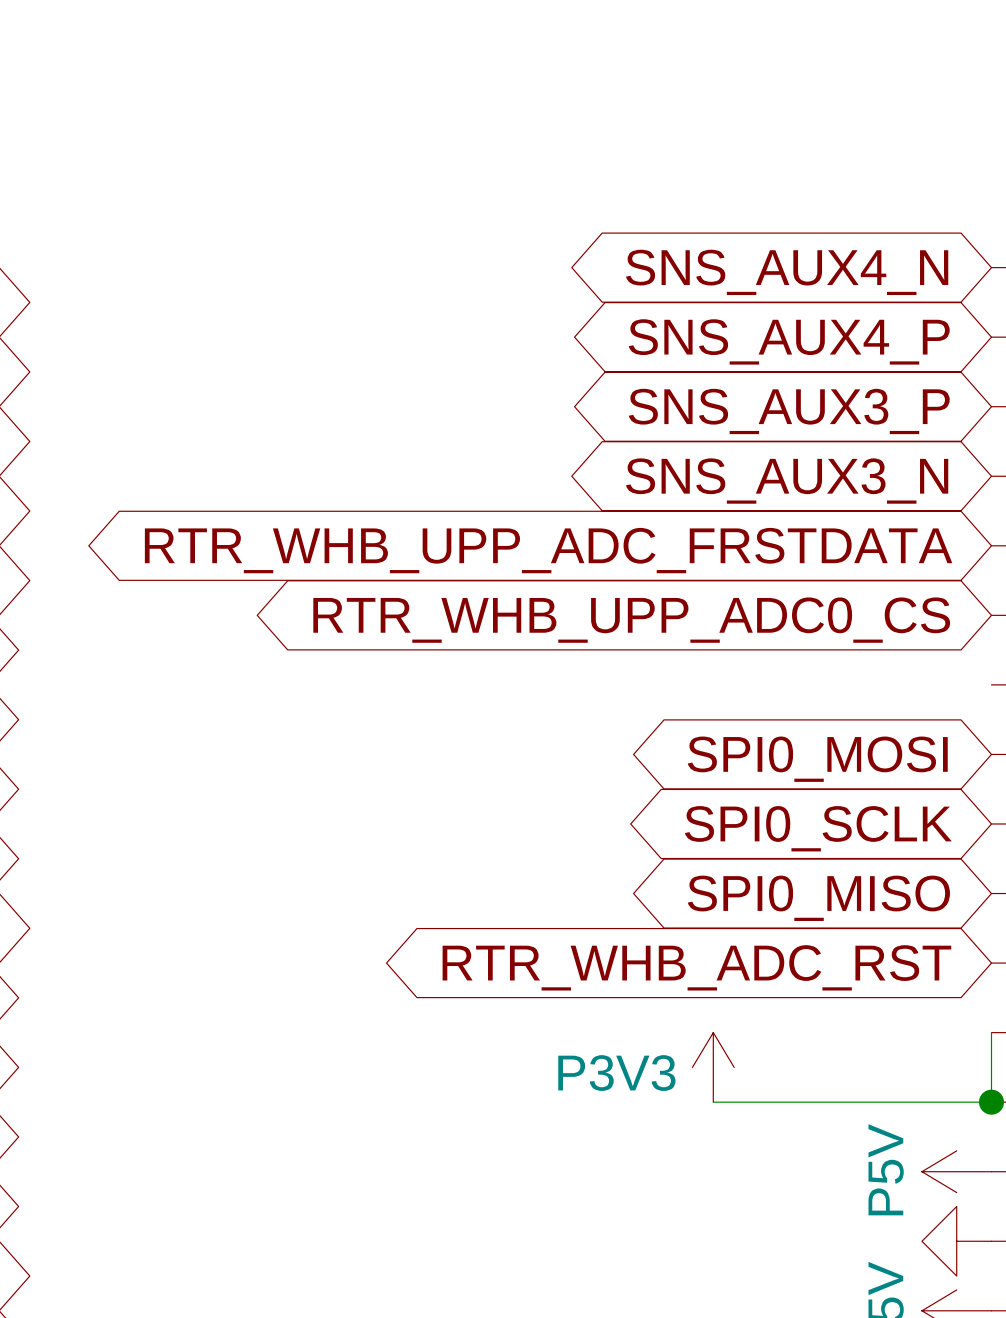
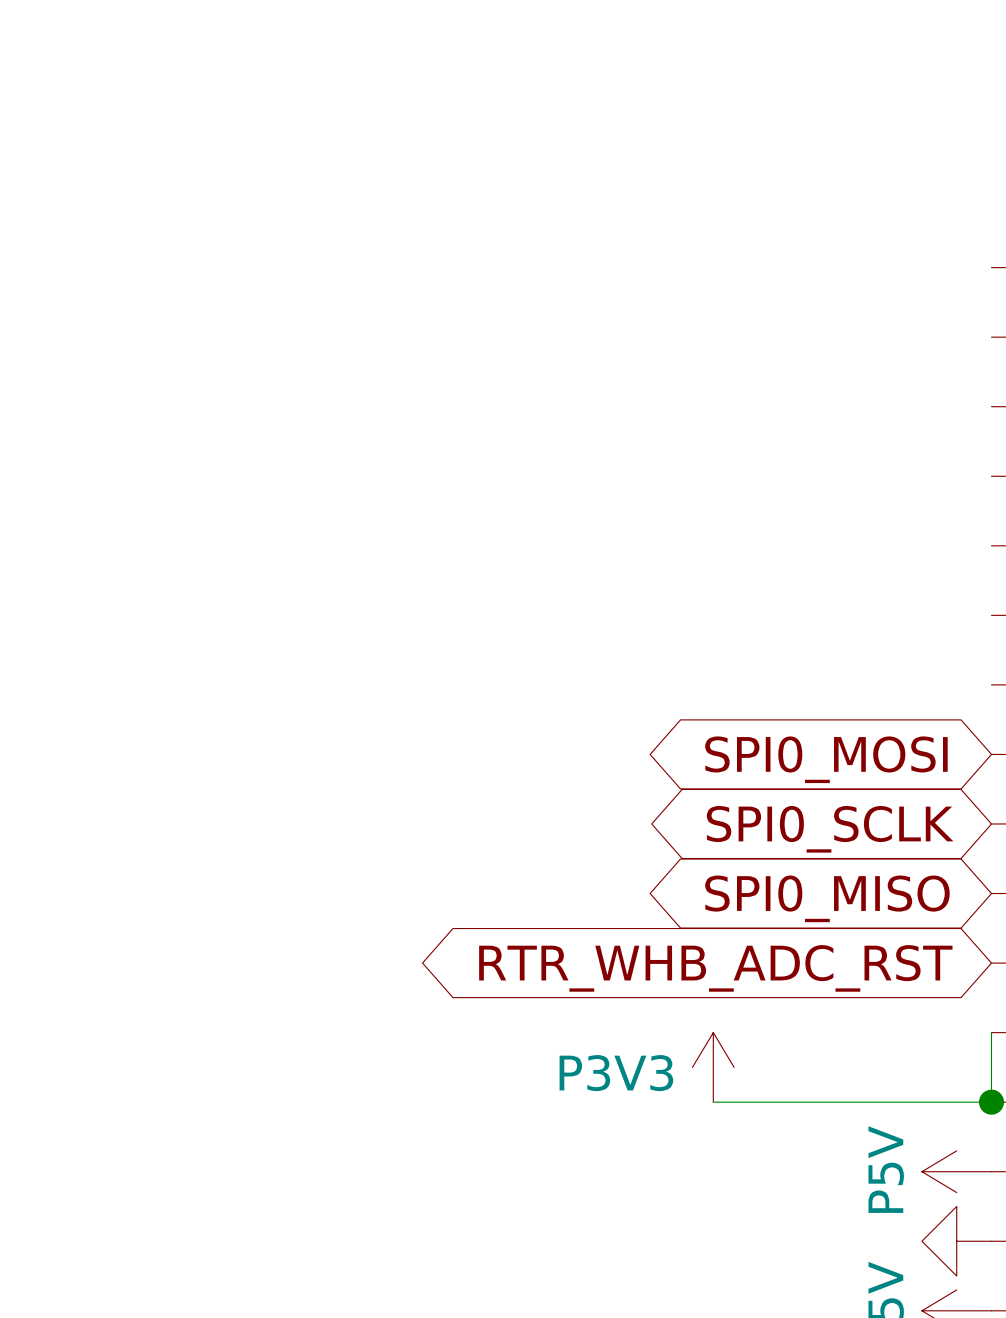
global label: SNS_AUX4_N (787, 272) -> none
global label: SNS_AUX4_P (789, 341) -> none
global label: SNS_AUX3_P (789, 411) -> none
global label: SNS_AUX3_N (787, 481) -> none
global label: RTR_WHB_UPP_ADC_FRSTDATA (548, 550) -> none
global label: RTR_WHB_UPP_ADC0_CS (631, 620) -> none

